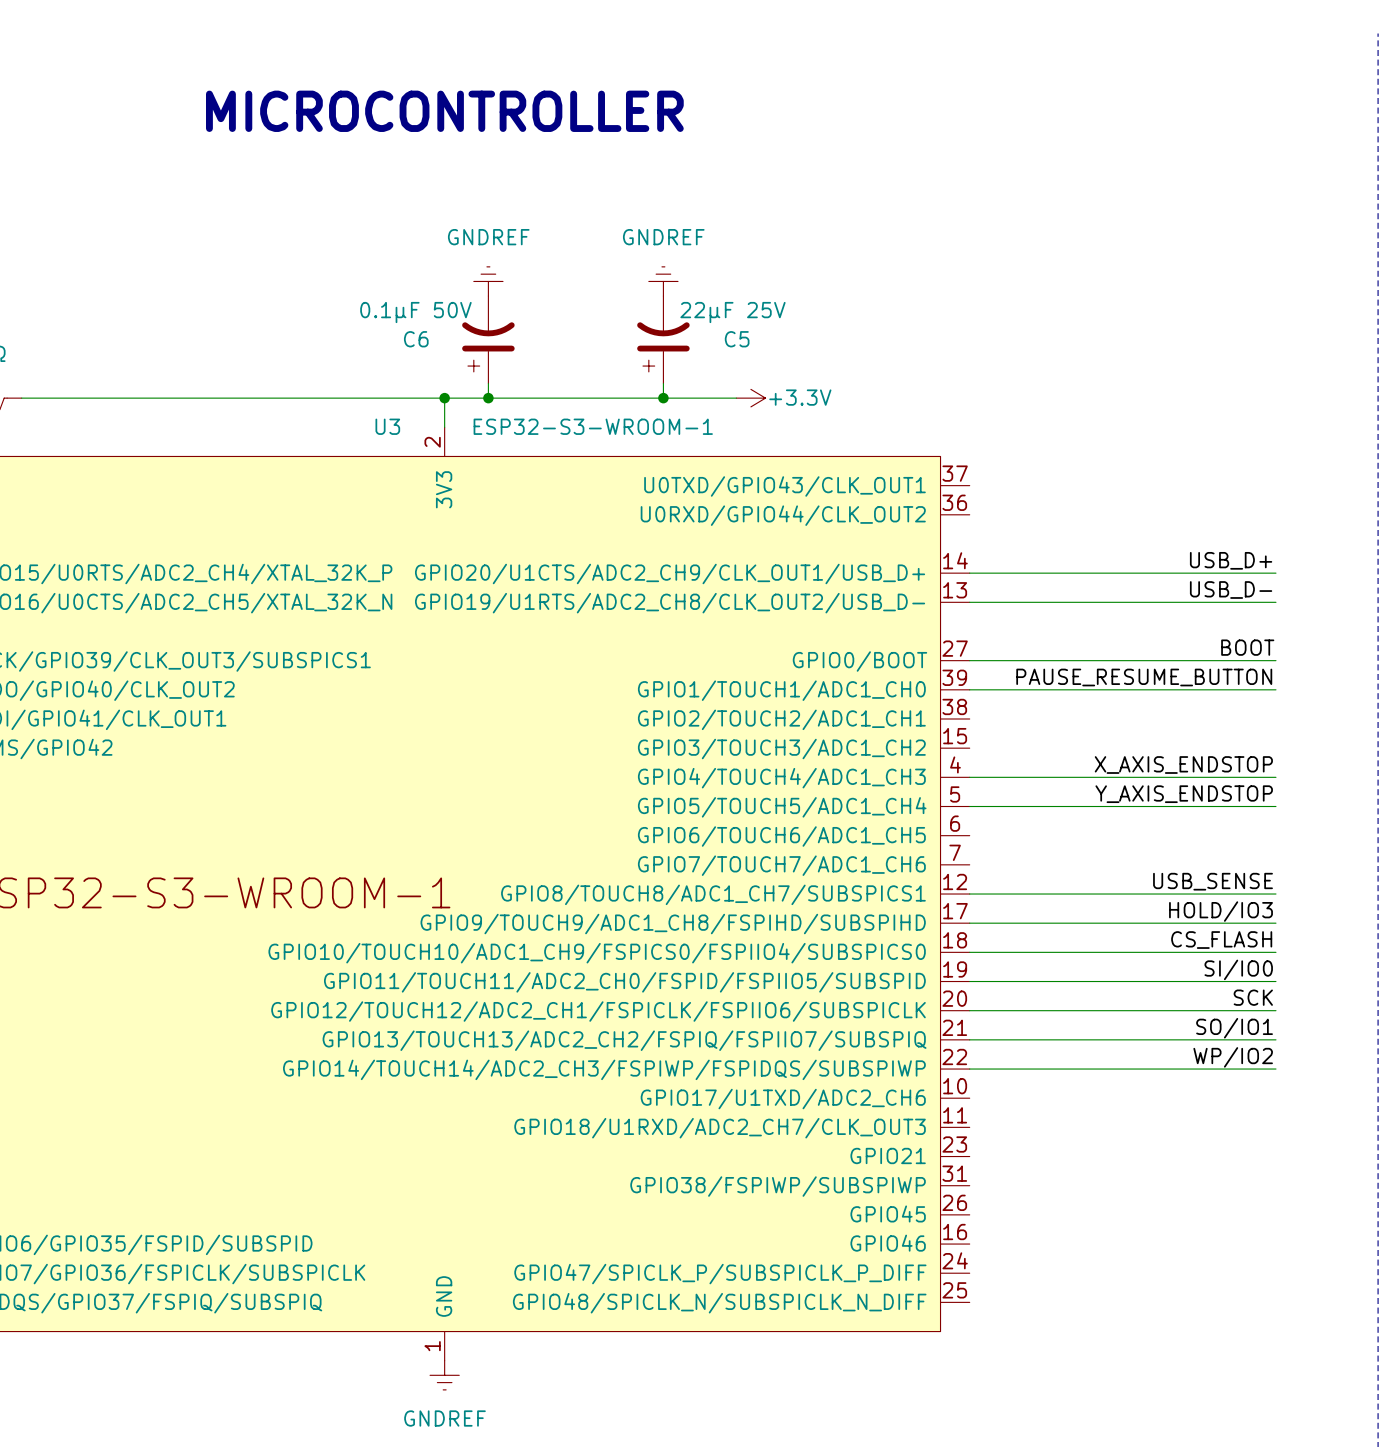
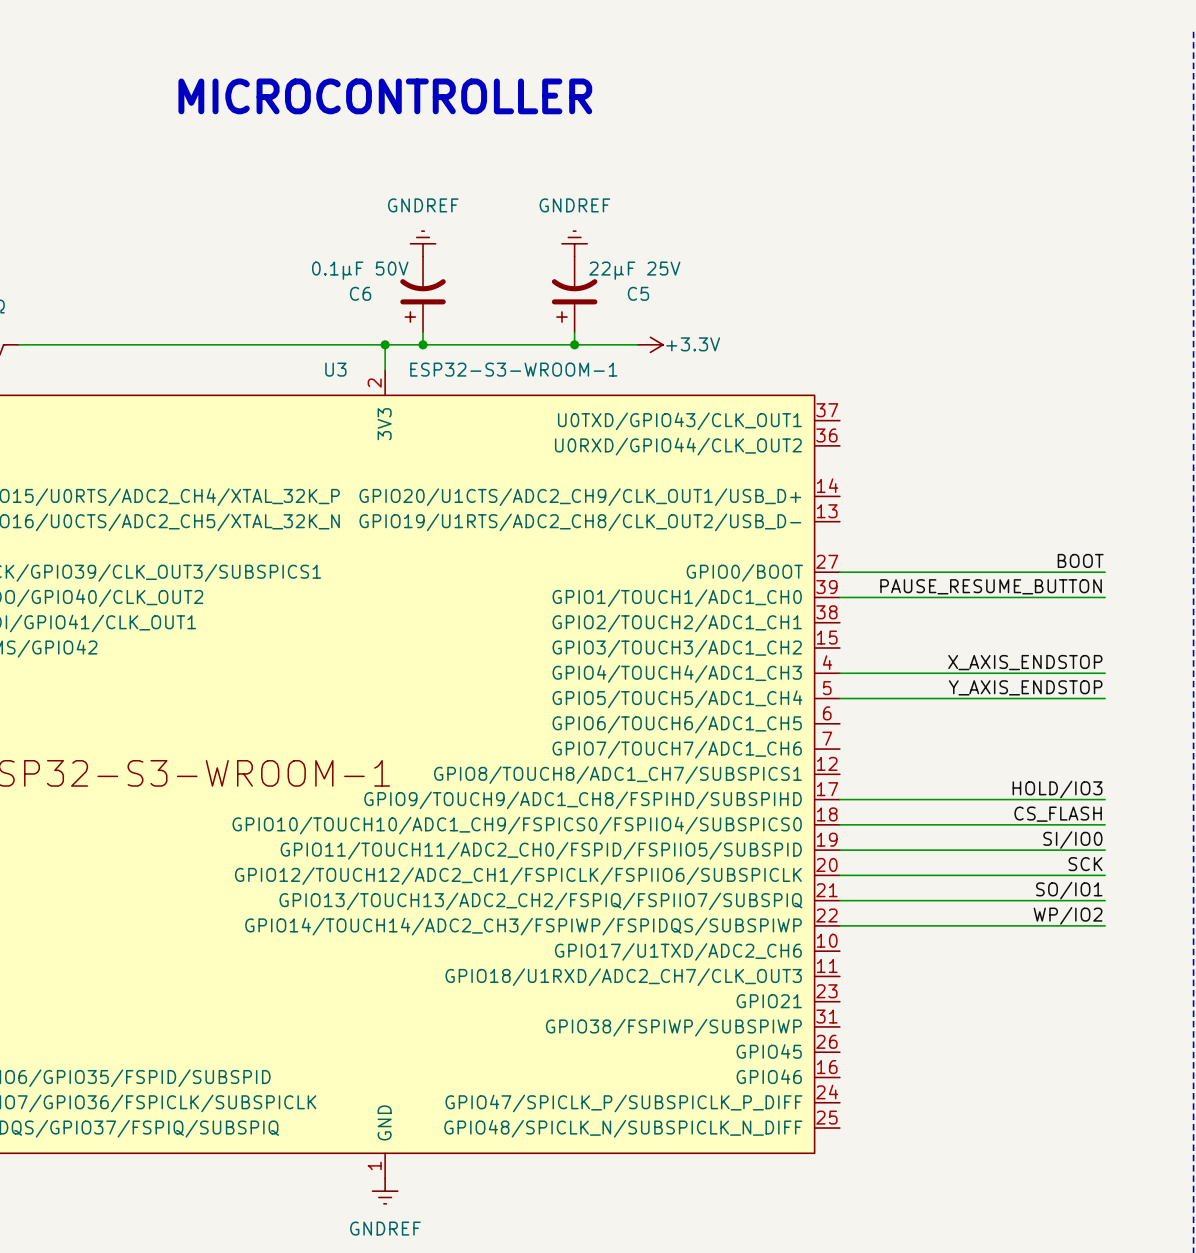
label: USB_D+ (1231, 560) -> none
wire: (969, 573) (1275, 573) -> none
label: USB_D- (1231, 589) -> none
wire: (969, 602) (1275, 602) -> none
label: USB_SENSE (1213, 881) -> none
wire: (969, 894) (1275, 894) -> none

